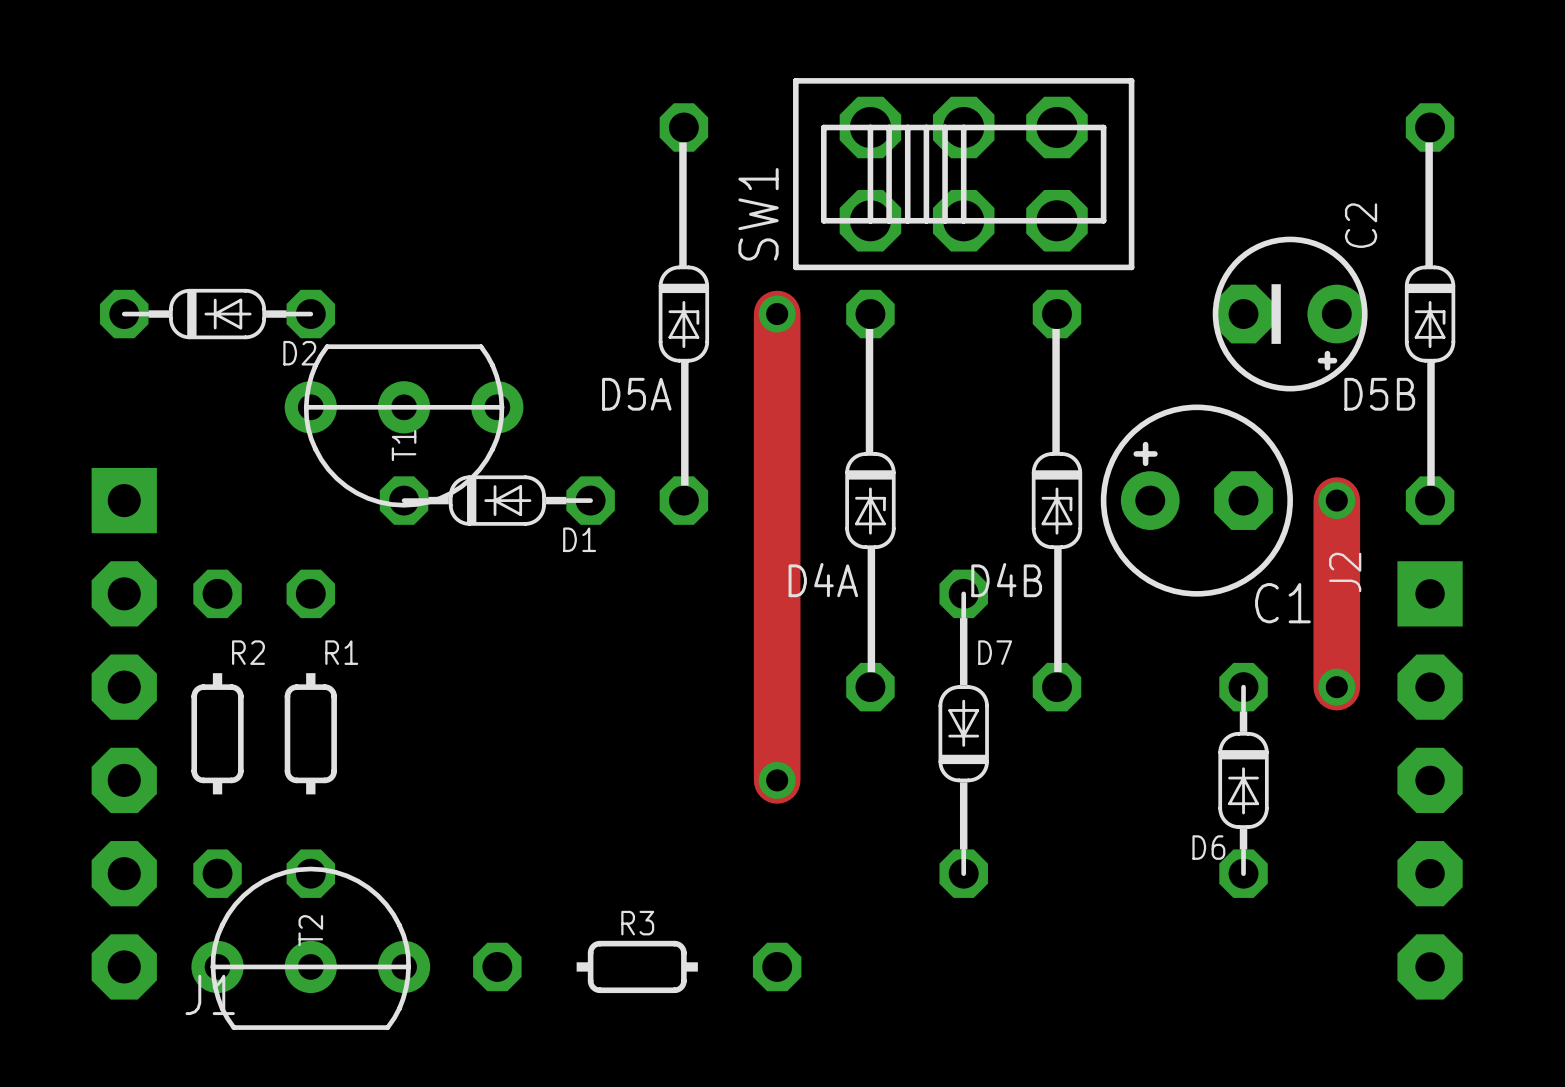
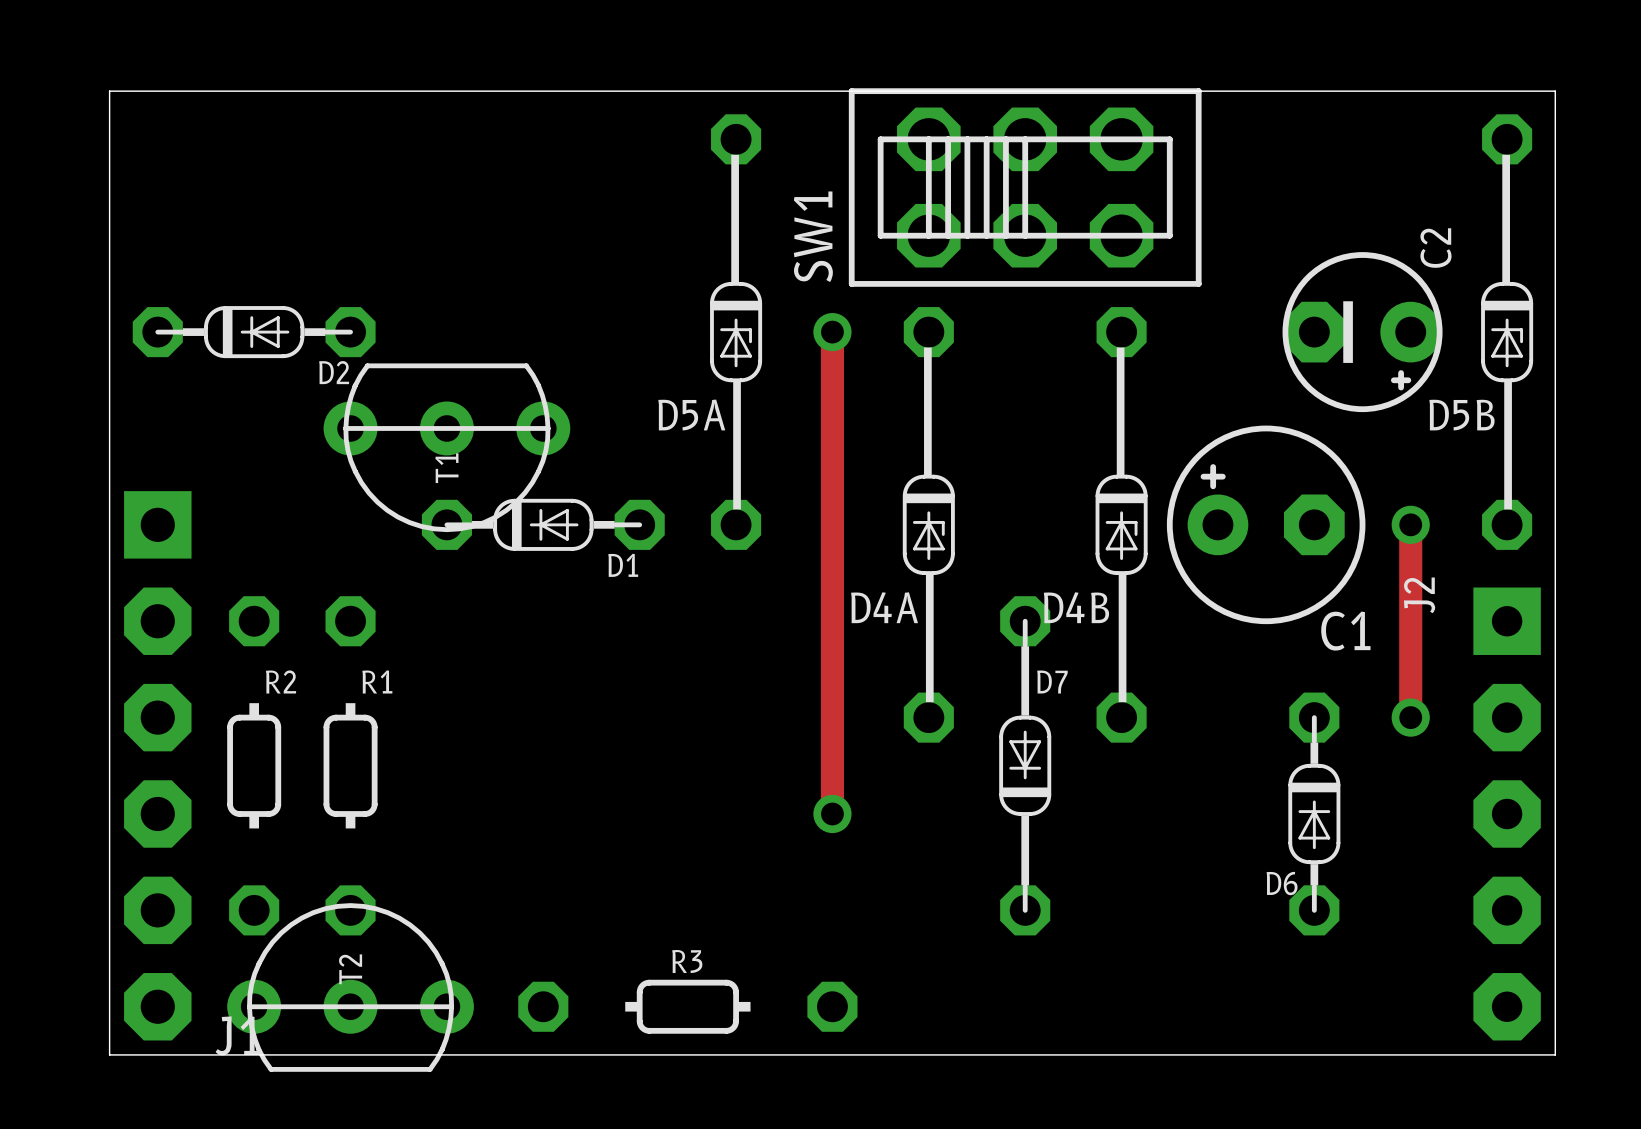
board edge: none -> (109, 91) (1555, 91) (1555, 1054) (109, 1054) (109, 91)
track width: thick (777, 314) (777, 780) -> thin (832, 332) (832, 813)
track width: thick (1336, 500) (1336, 687) -> thin (1410, 524) (1410, 717)

